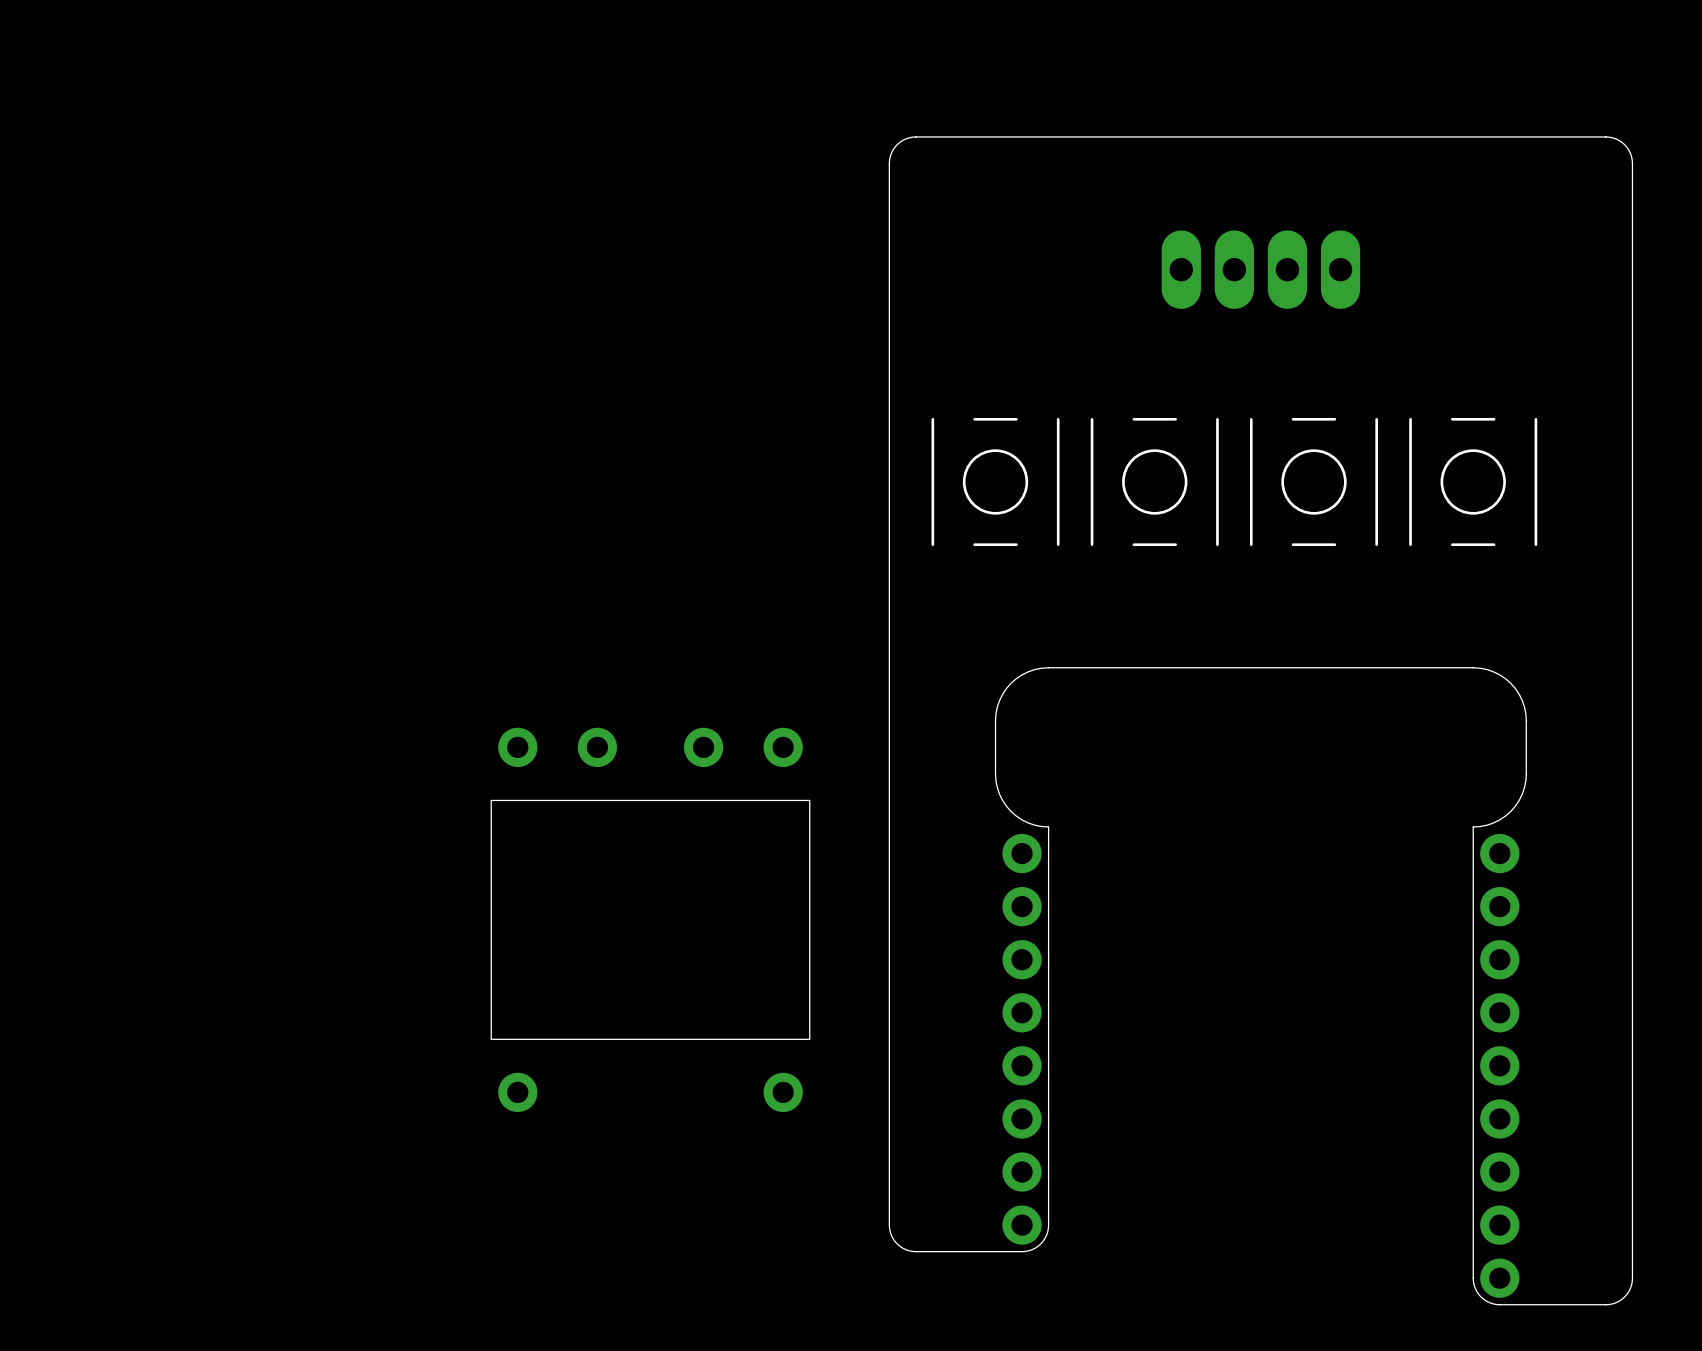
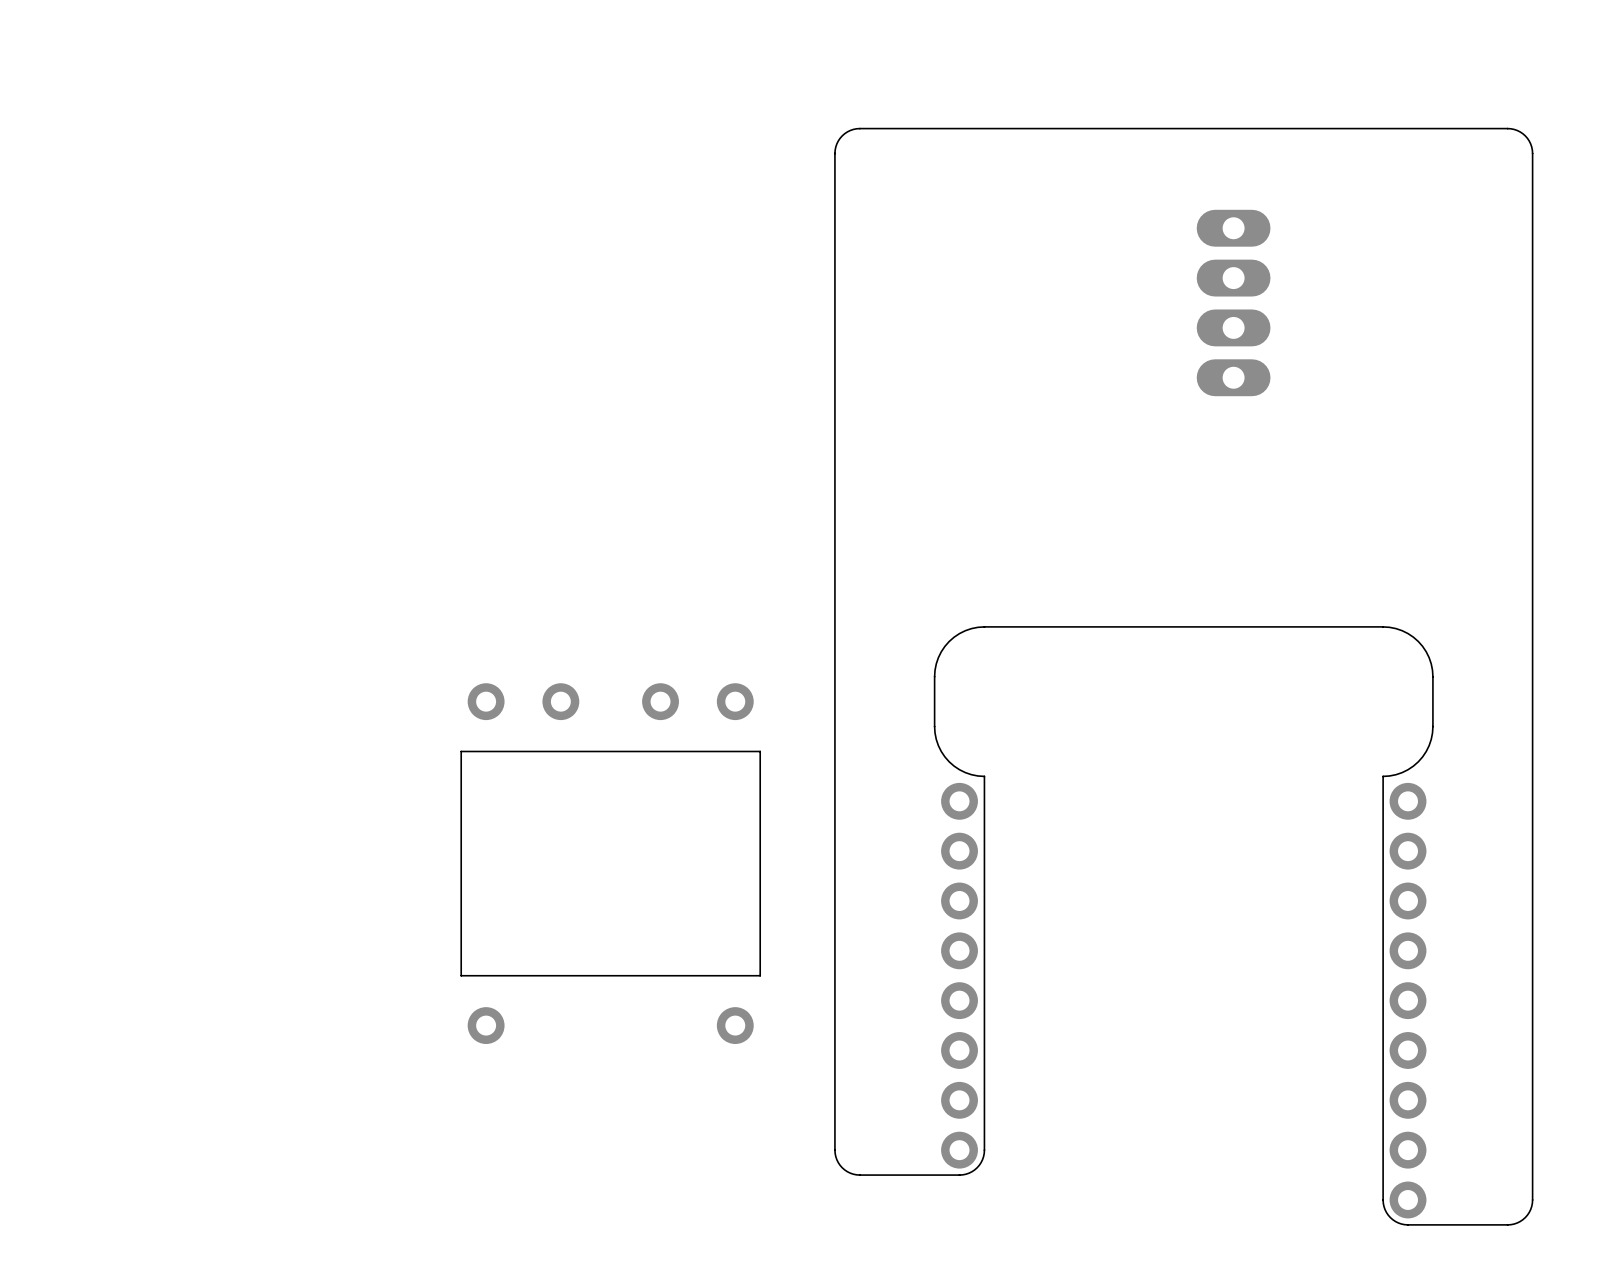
part rotation: 0° (1260, 269) -> 90° clockwise (1233, 303)
part: (995, 481) -> none
part: (1154, 481) -> none
part: (1313, 481) -> none
part: (1473, 481) -> none

